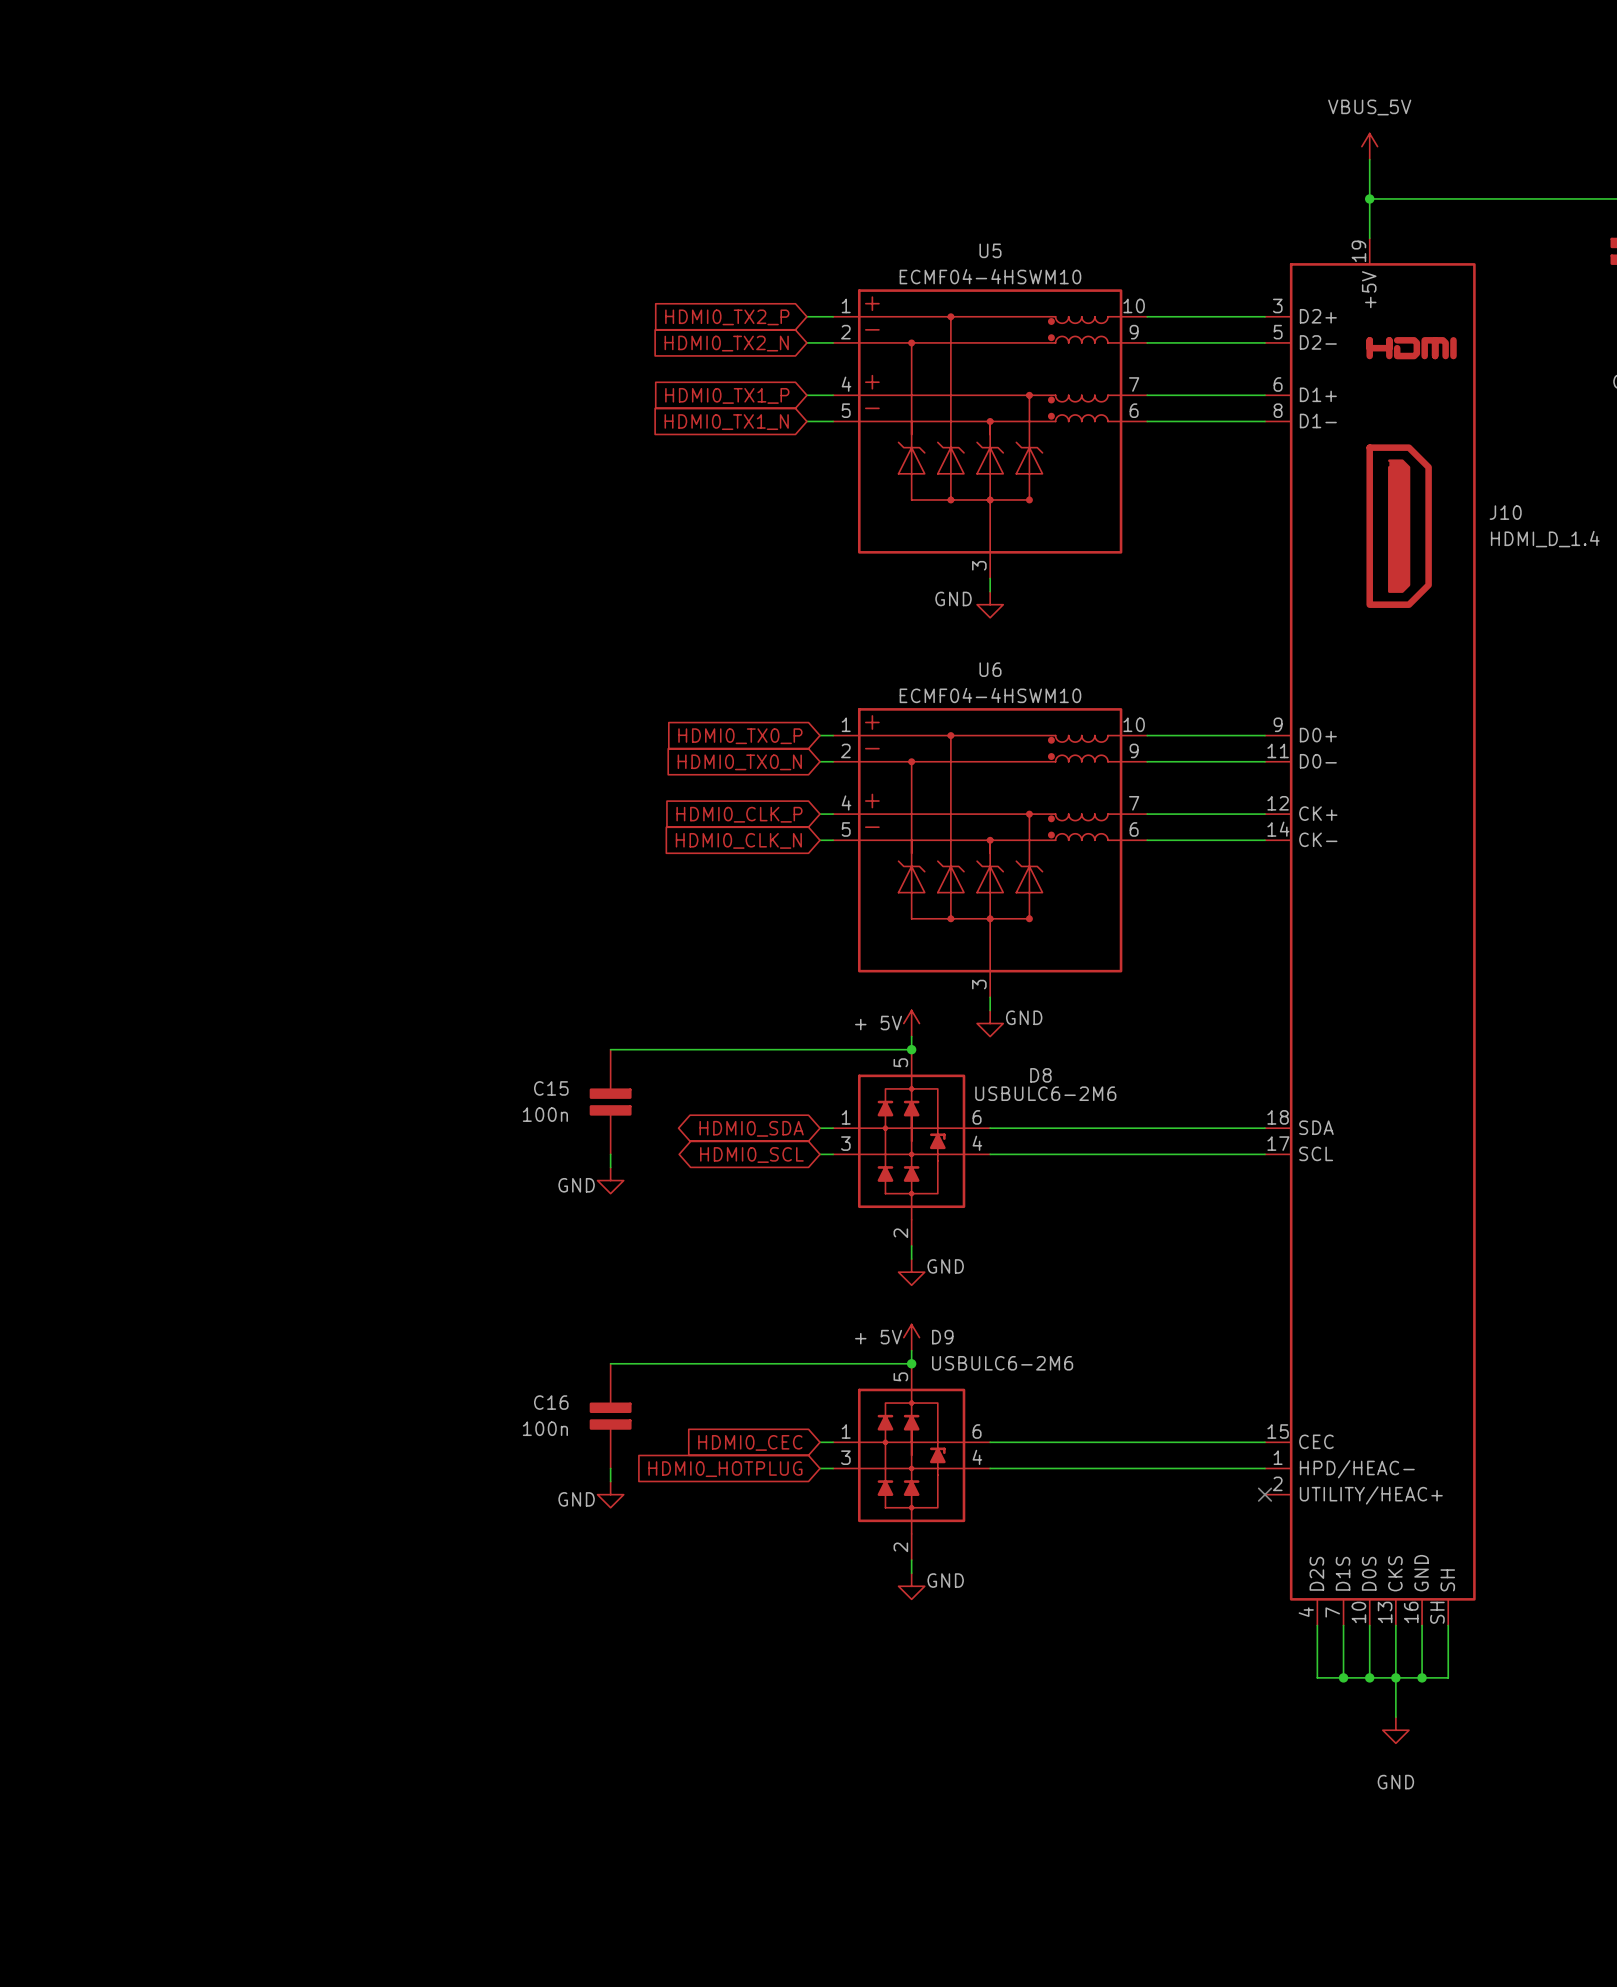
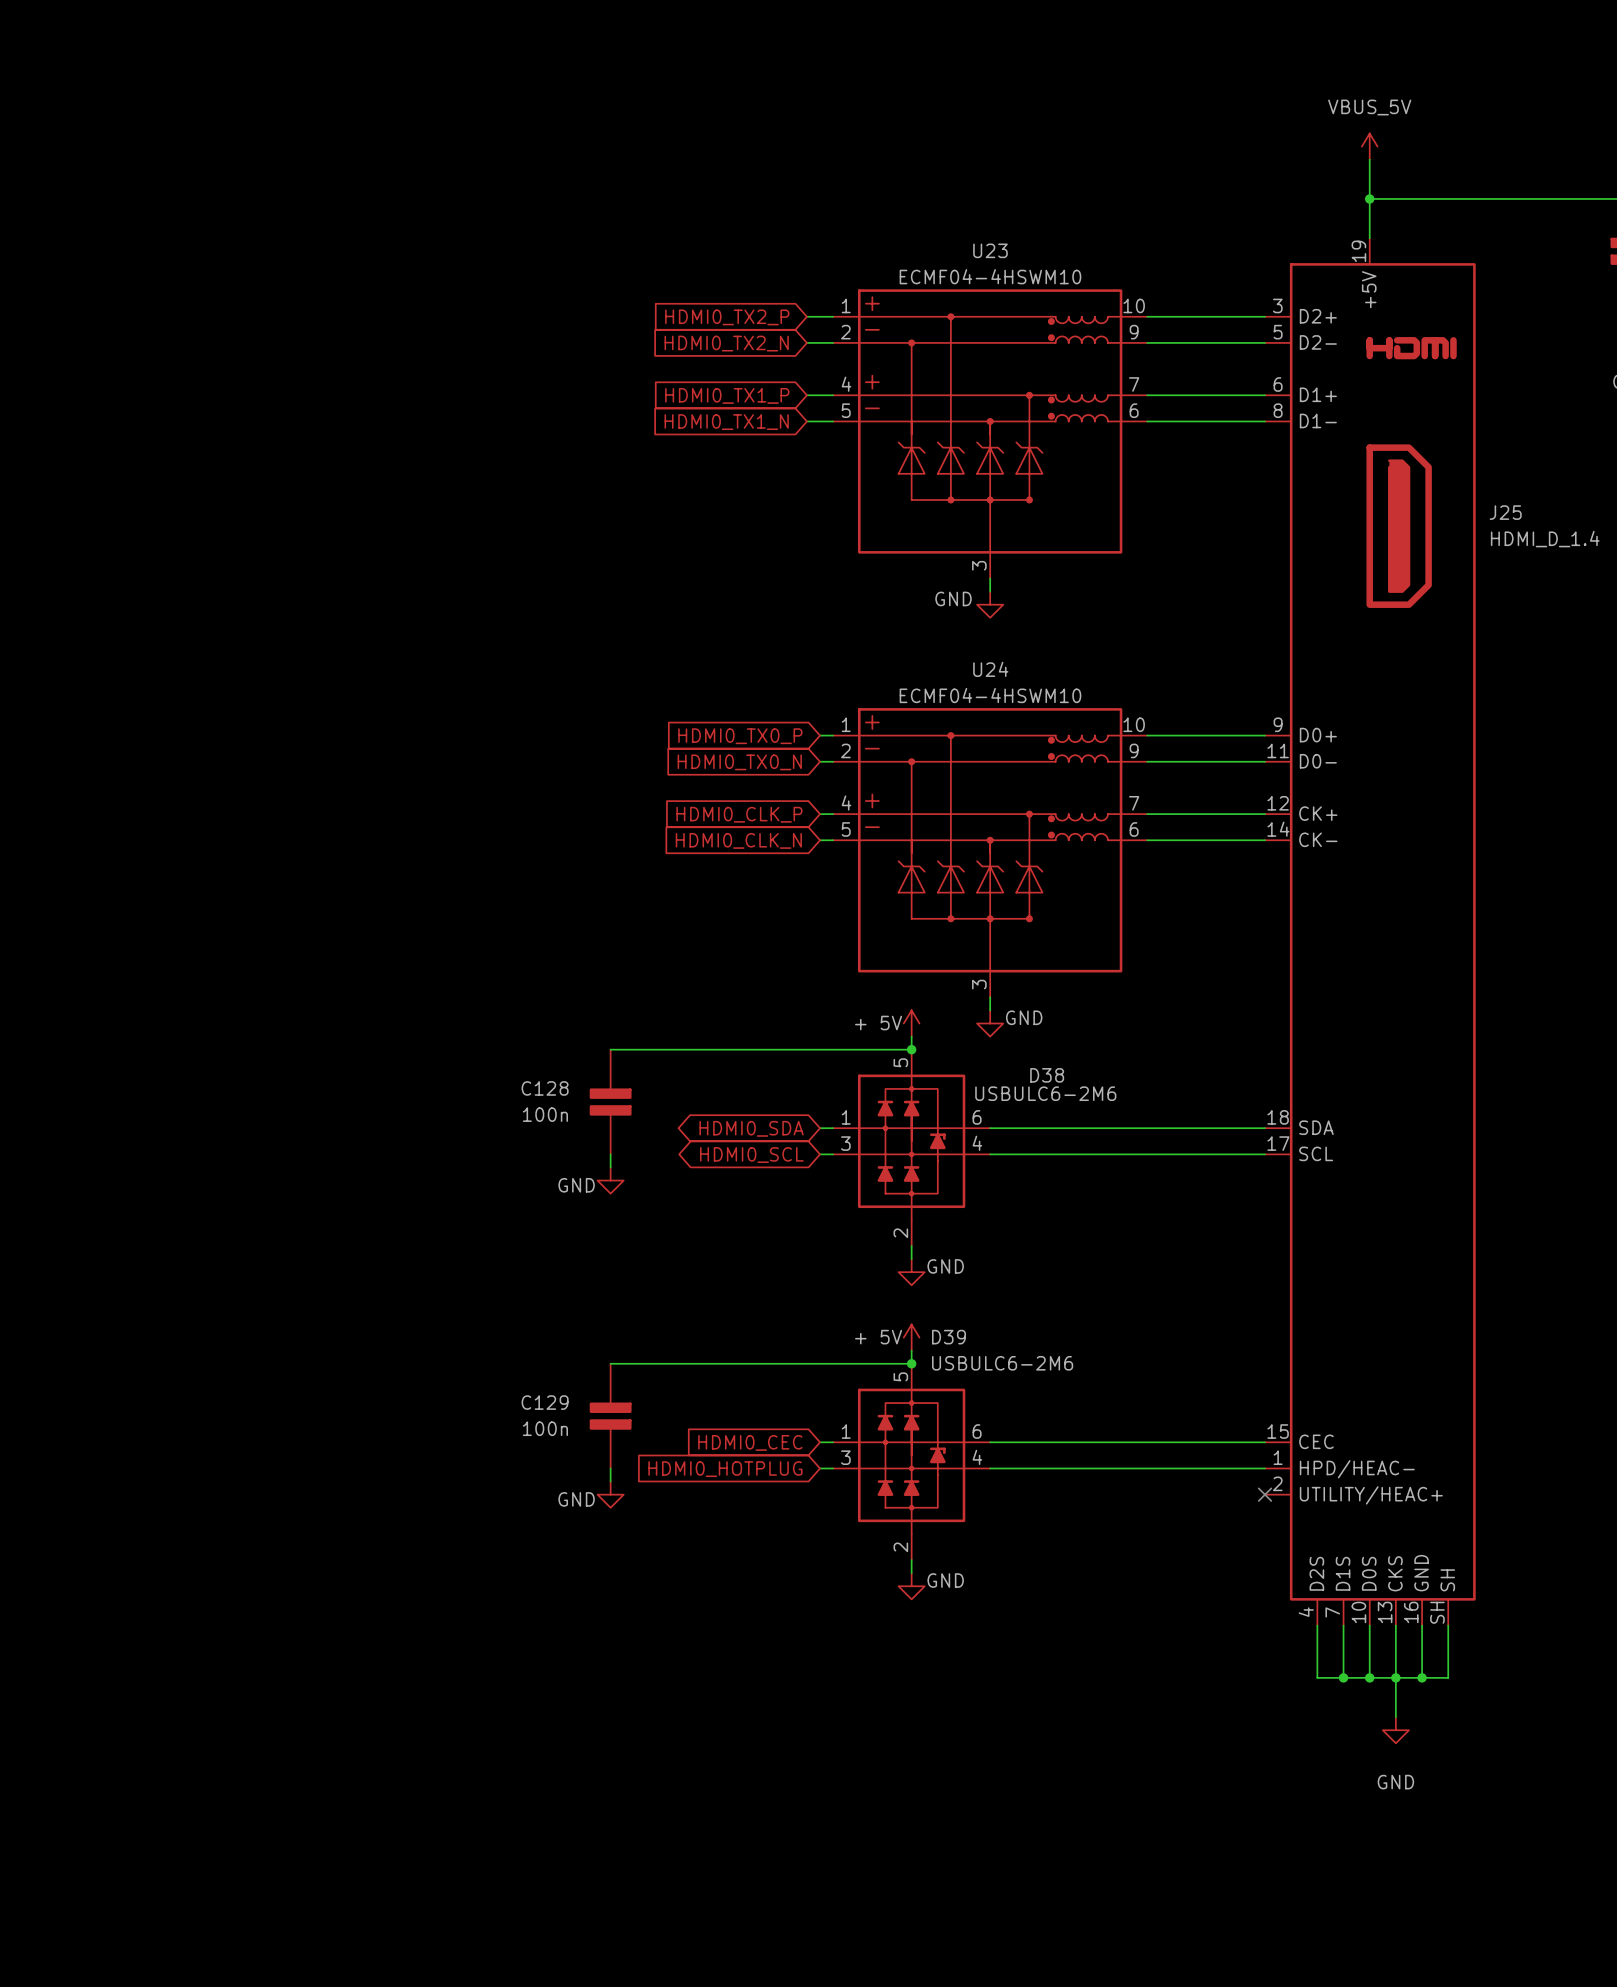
U5 name: U5 (990, 250) -> U23 (990, 250)
J10 name: J10 (1505, 512) -> J25 (1505, 512)
U6 name: U6 (990, 669) -> U24 (990, 669)
D8 name: D8 (1040, 1075) -> D38 (1047, 1075)
C15 name: C15 (551, 1088) -> C128 (545, 1088)
D9 name: D9 (942, 1337) -> D39 (949, 1337)
C16 name: C16 (551, 1402) -> C129 (545, 1402)

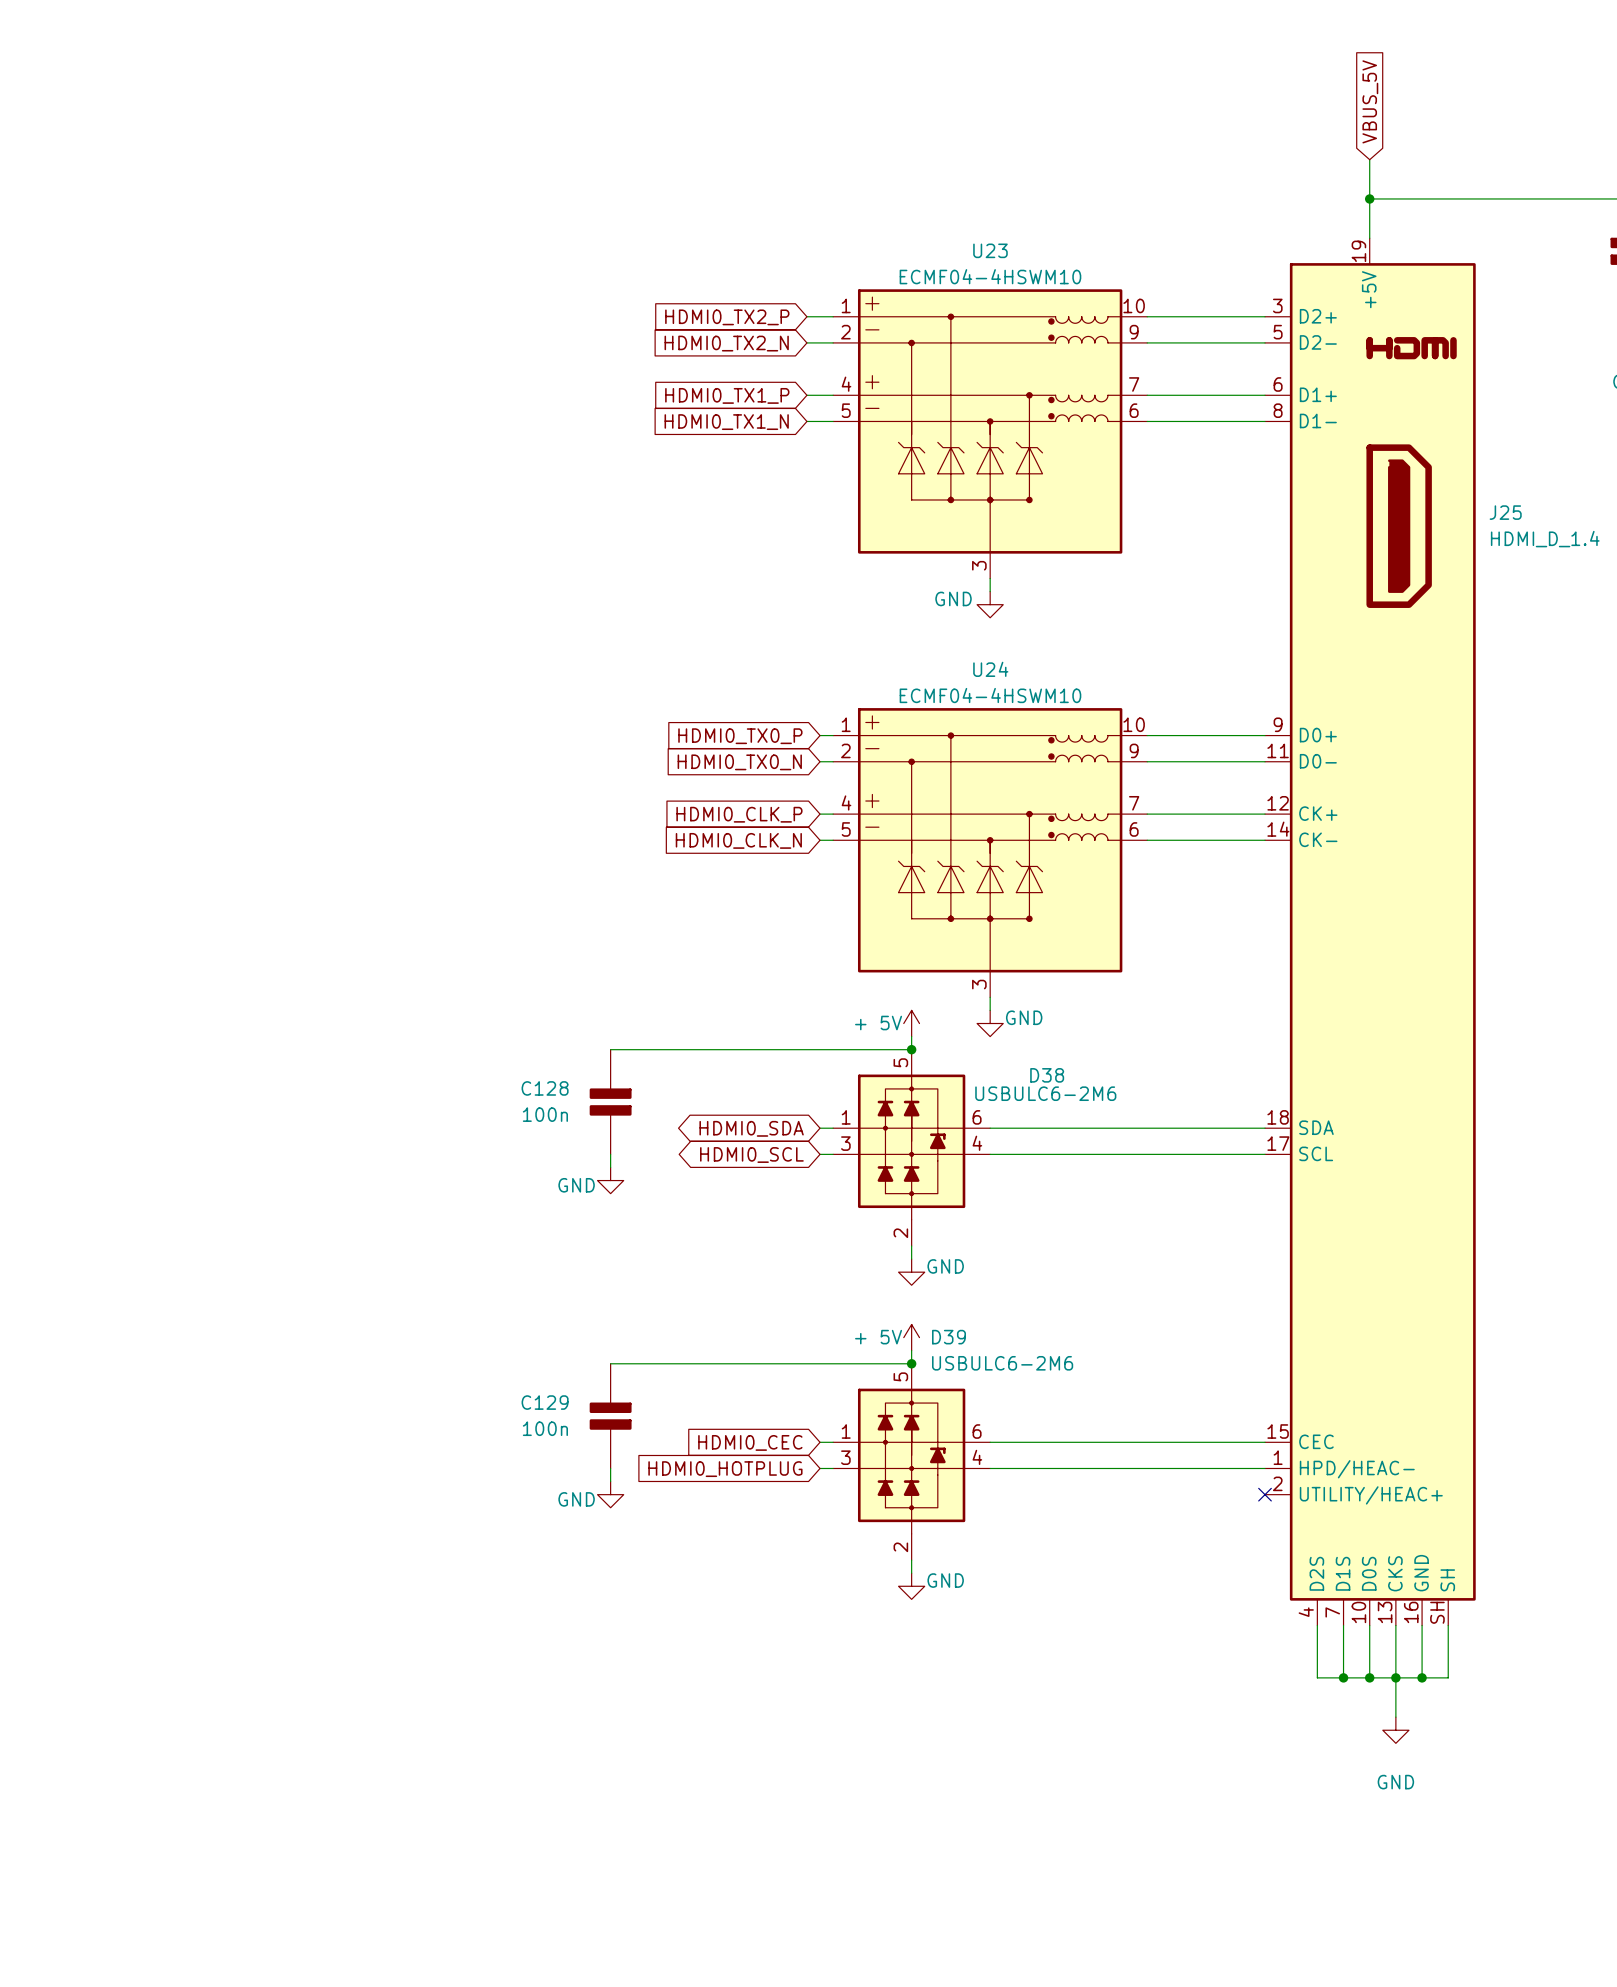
global label: none -> VBUS_5V (1370, 101)
power symbol: VBUS_5V (1369, 146) -> none

